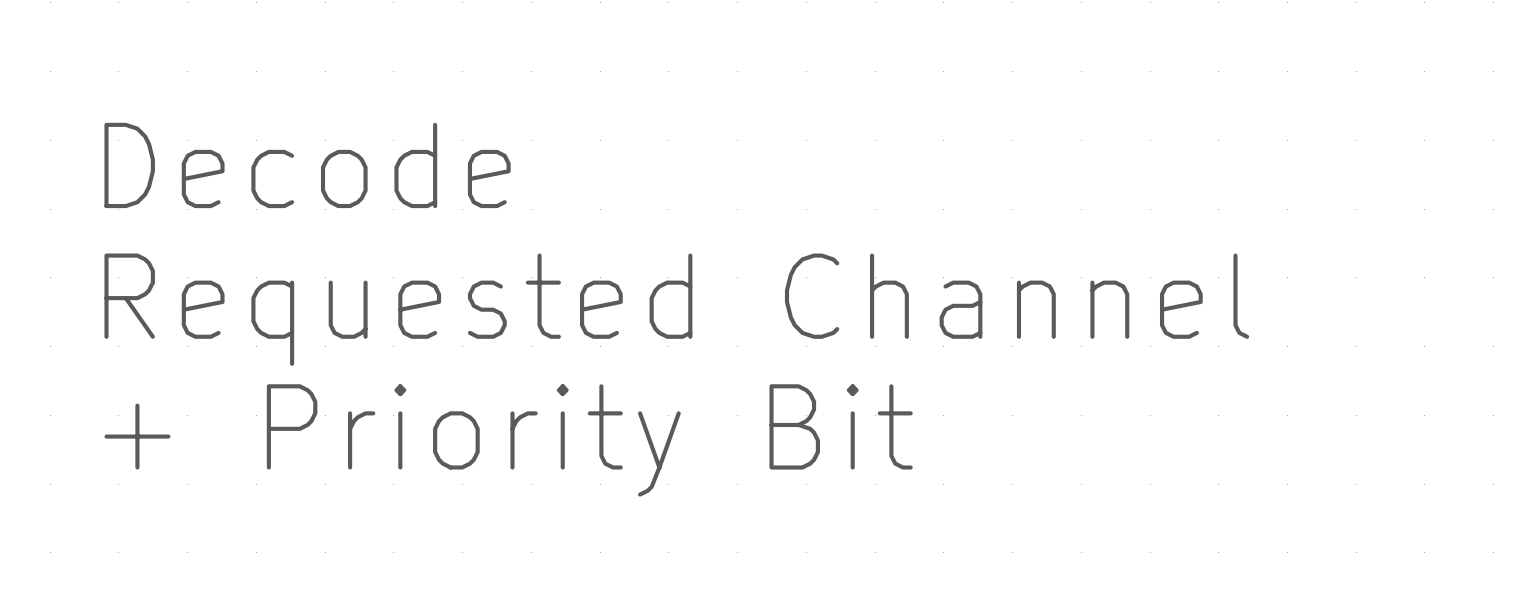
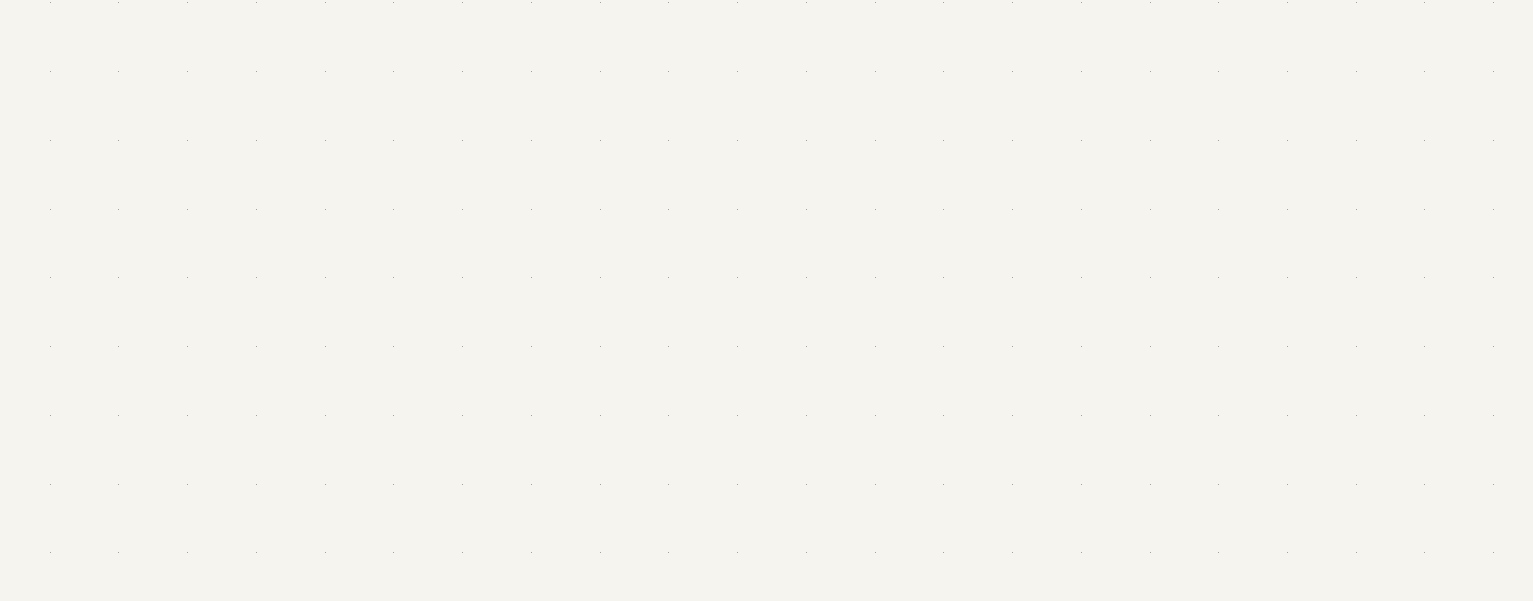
text: Decode (307, 165) -> none
text: Requested Channel (676, 309) -> none
text: + Priority Bit (508, 440) -> none

